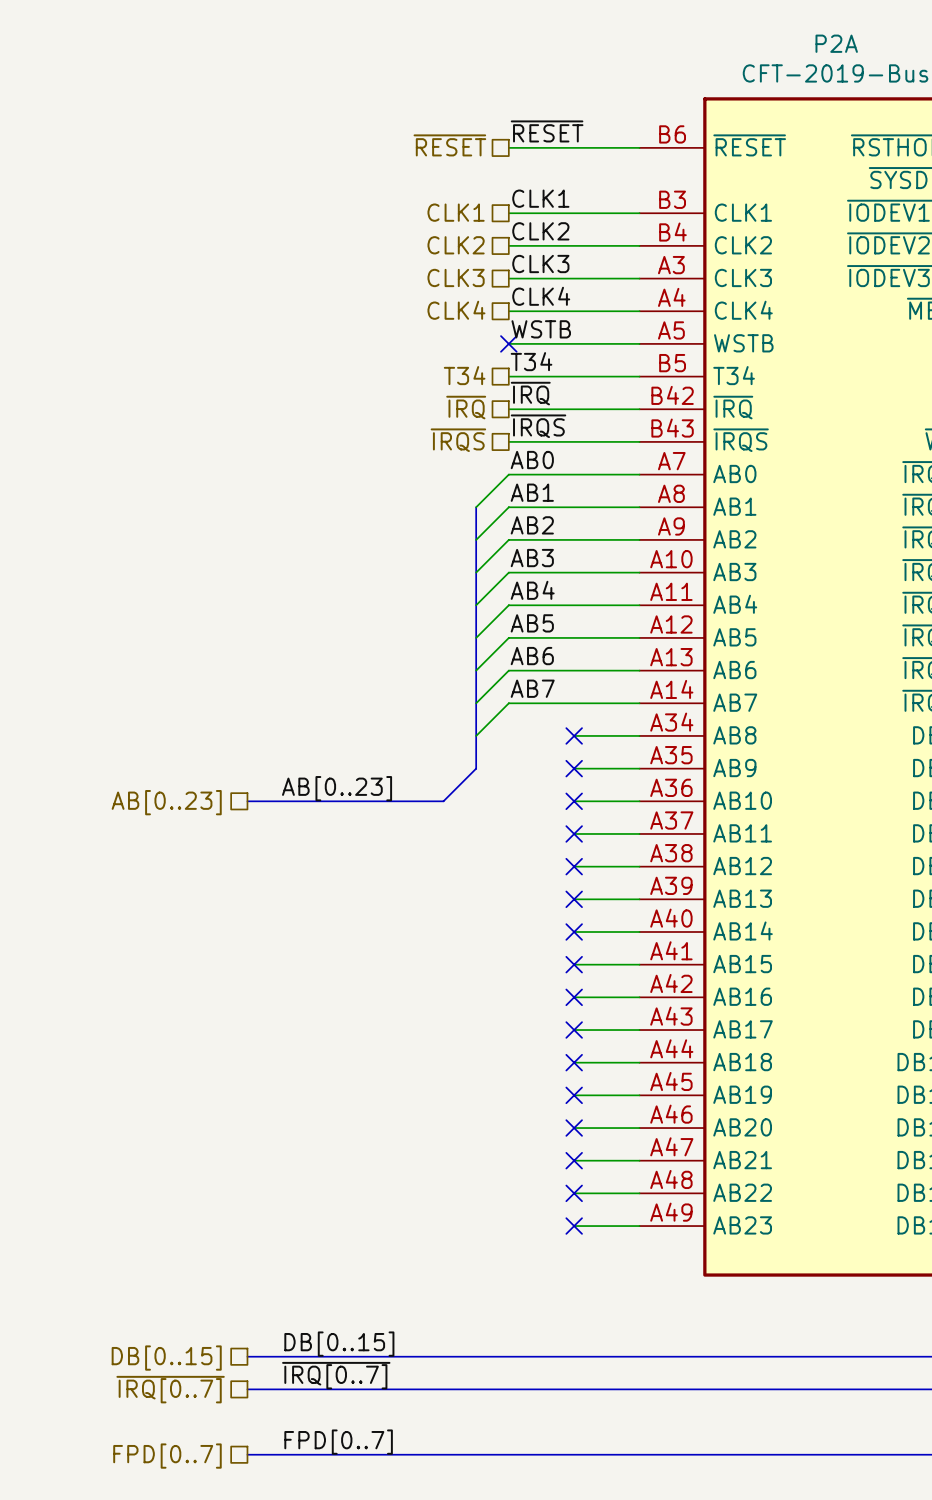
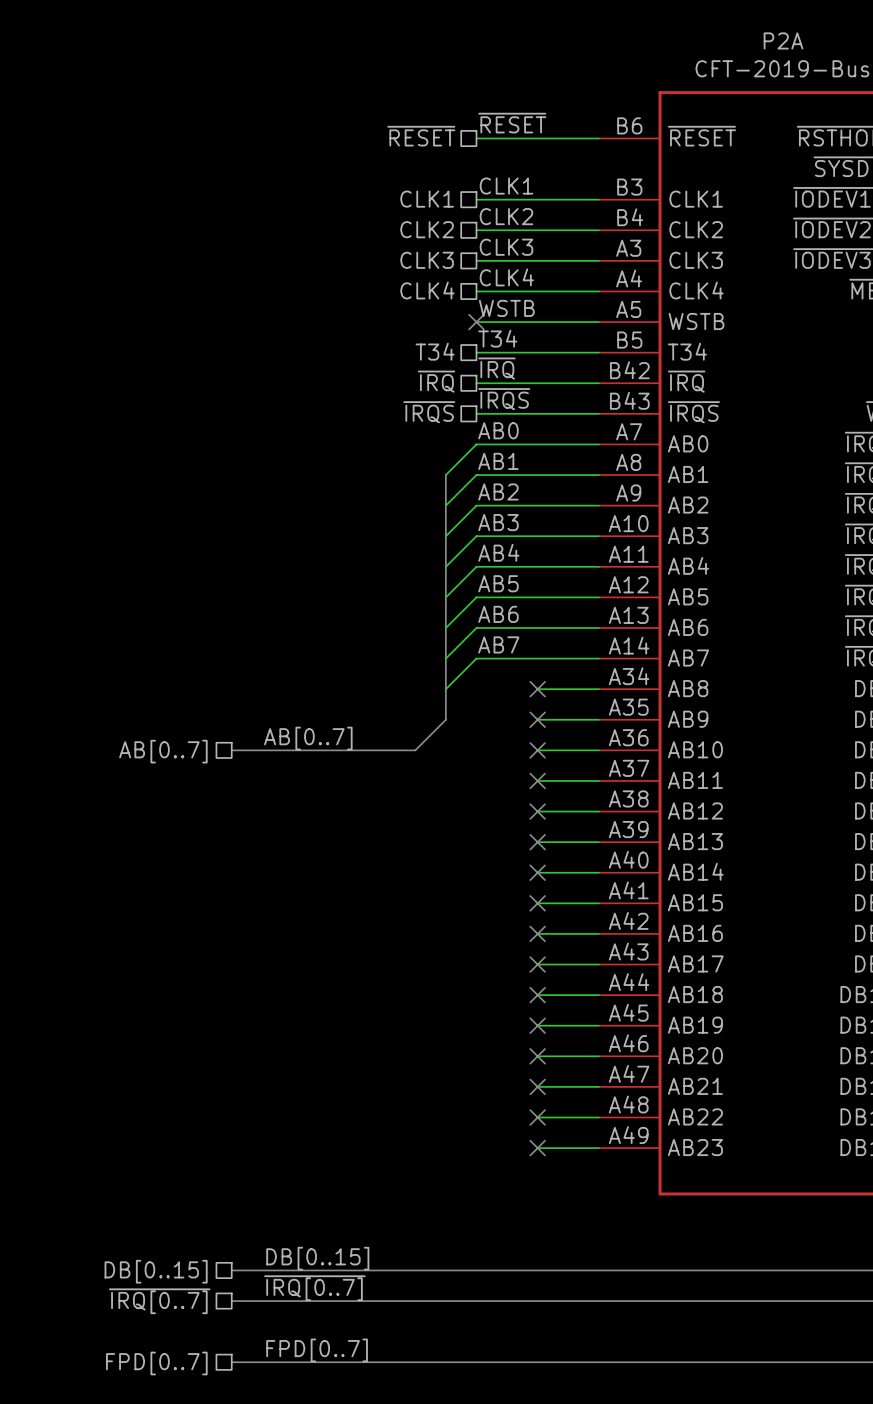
label: AB[0..23] (337, 788) -> AB[0..7] (308, 738)
hierarchical label: AB[0..23] (166, 802) -> AB[0..7] (163, 751)

